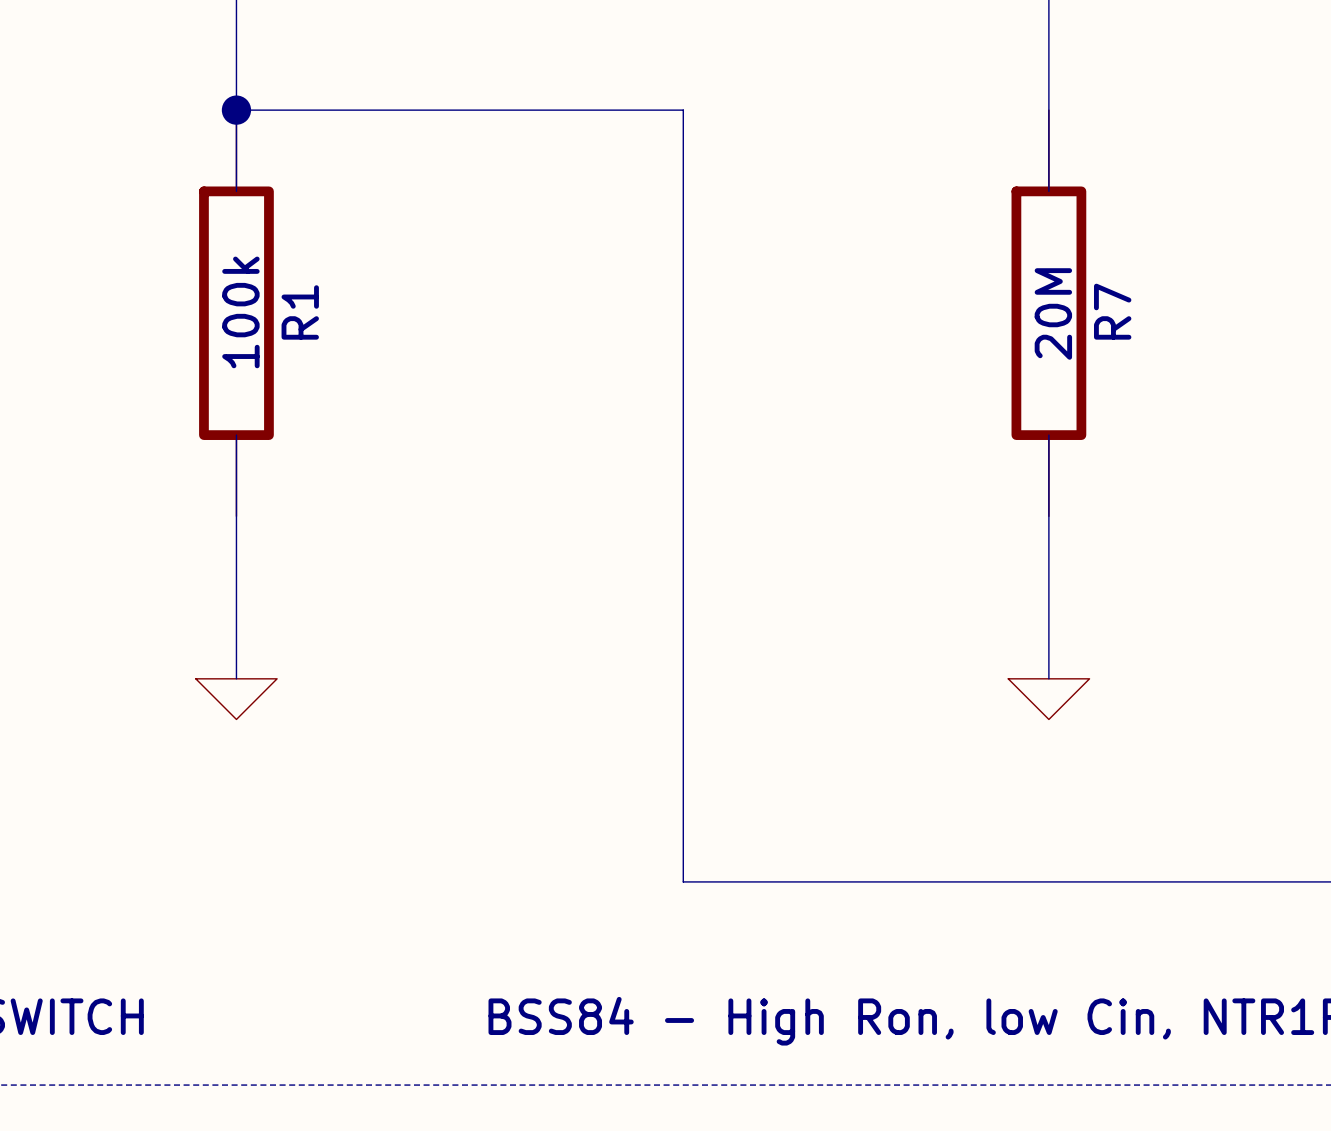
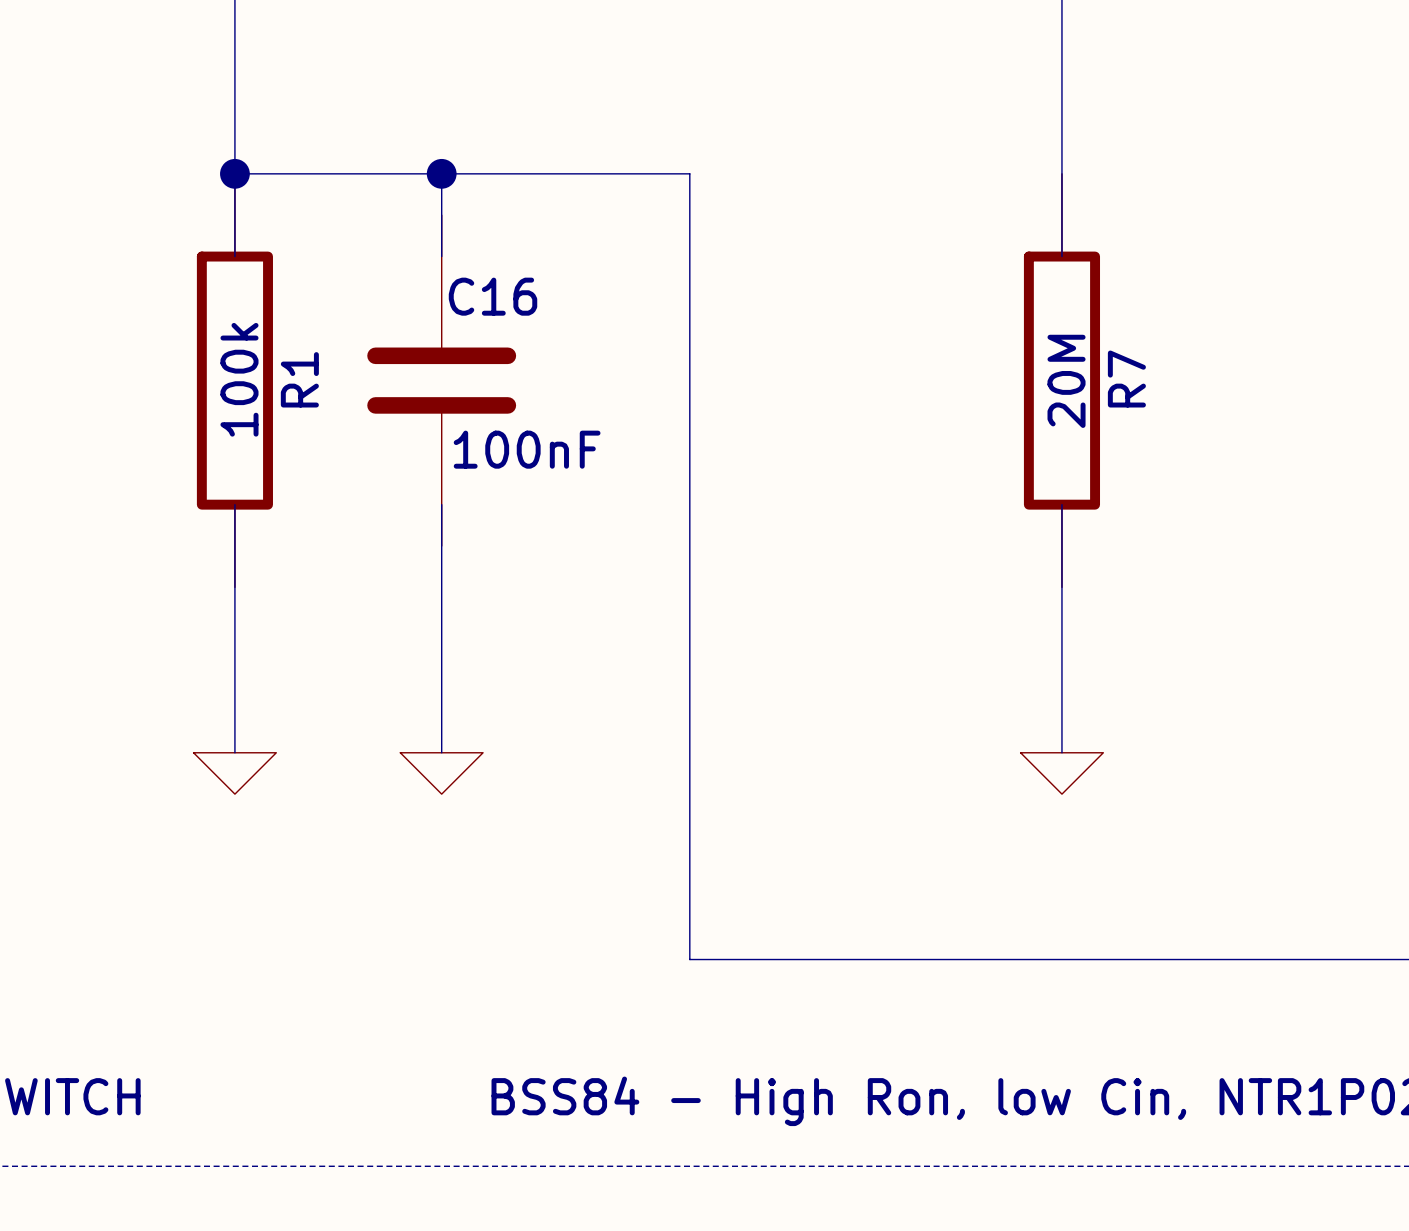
wire: none -> (441, 173) (441, 256)
junction: none -> (441, 173)
C16: none -> 100nF (441, 380)
wire: none -> (441, 504) (441, 752)
power symbol: none -> (441, 773)

